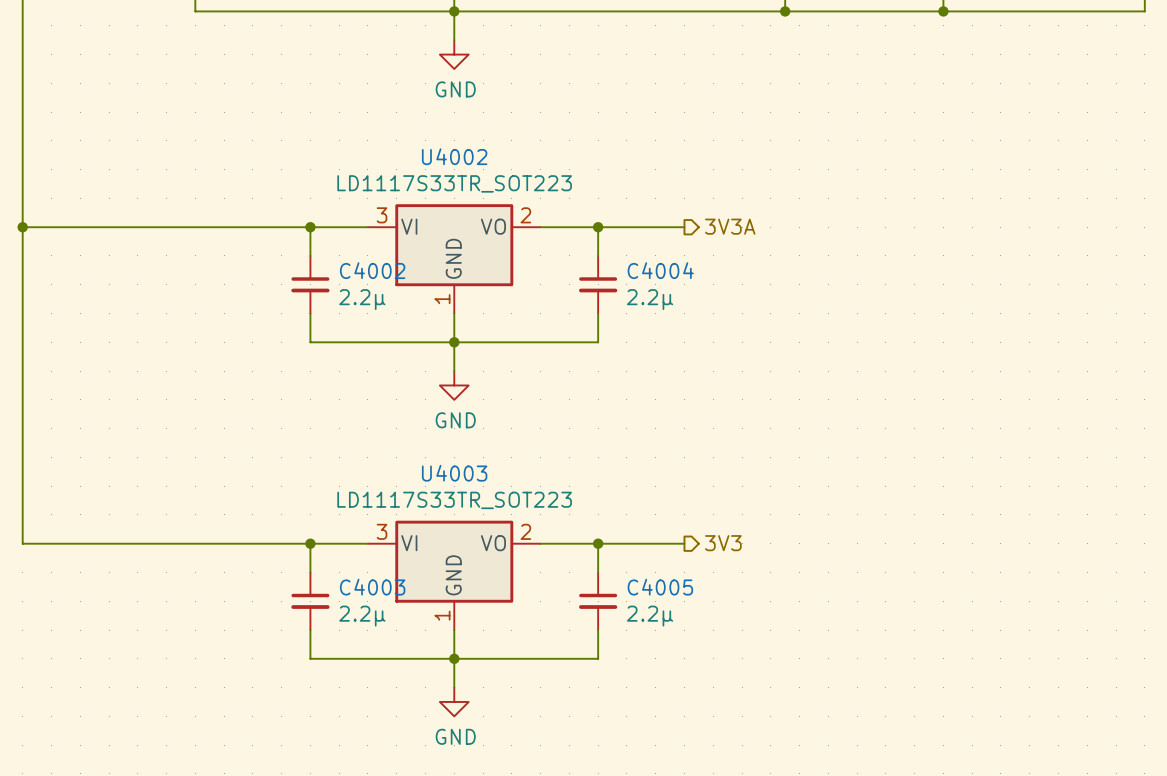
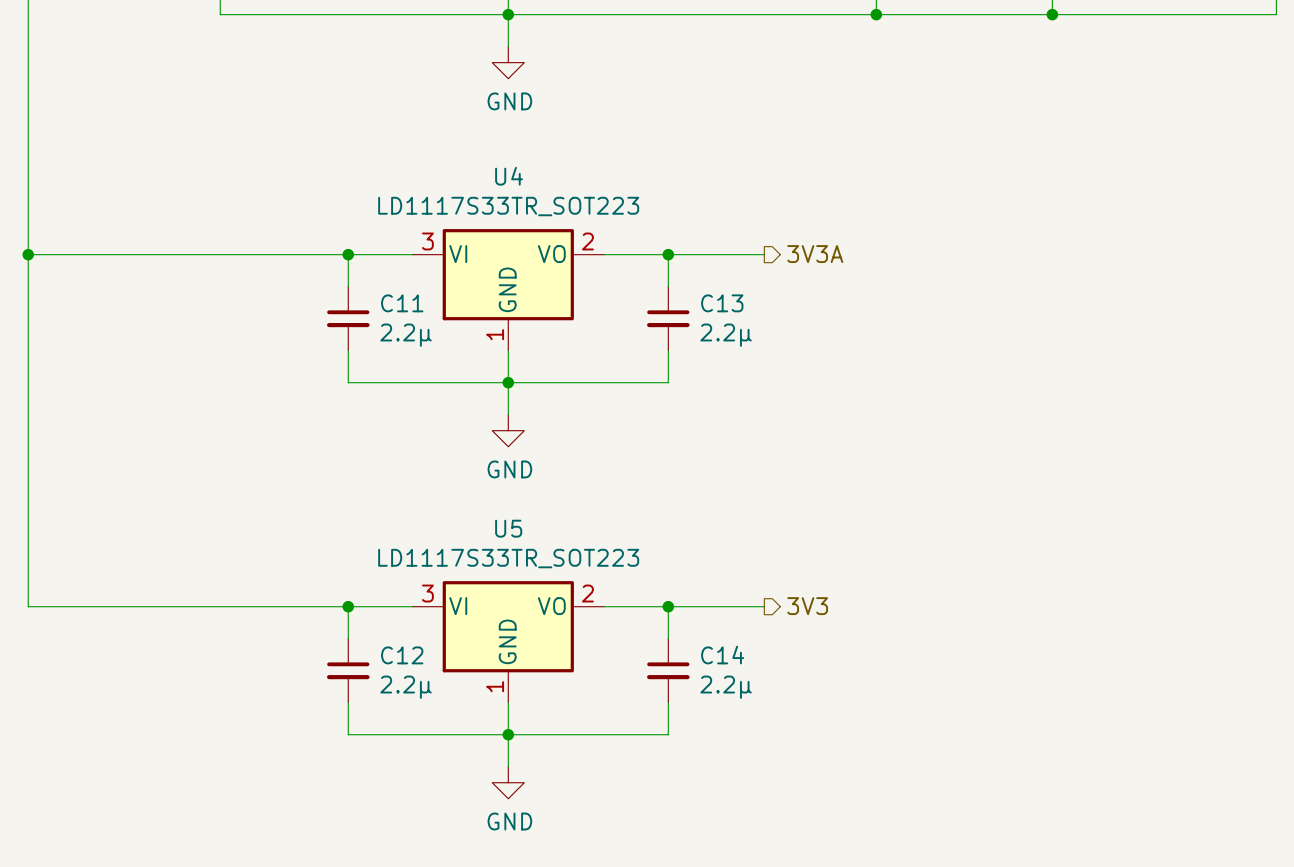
U4002 name: U4002 (454, 156) -> U4 (509, 176)
C4002 name: C4002 (372, 270) -> C11 (402, 303)
C4004 name: C4004 (660, 270) -> C13 (722, 303)
U4003 name: U4003 (454, 473) -> U5 (508, 528)
C4003 name: C4003 (372, 587) -> C12 (402, 655)
C4005 name: C4005 (660, 587) -> C14 (722, 655)

